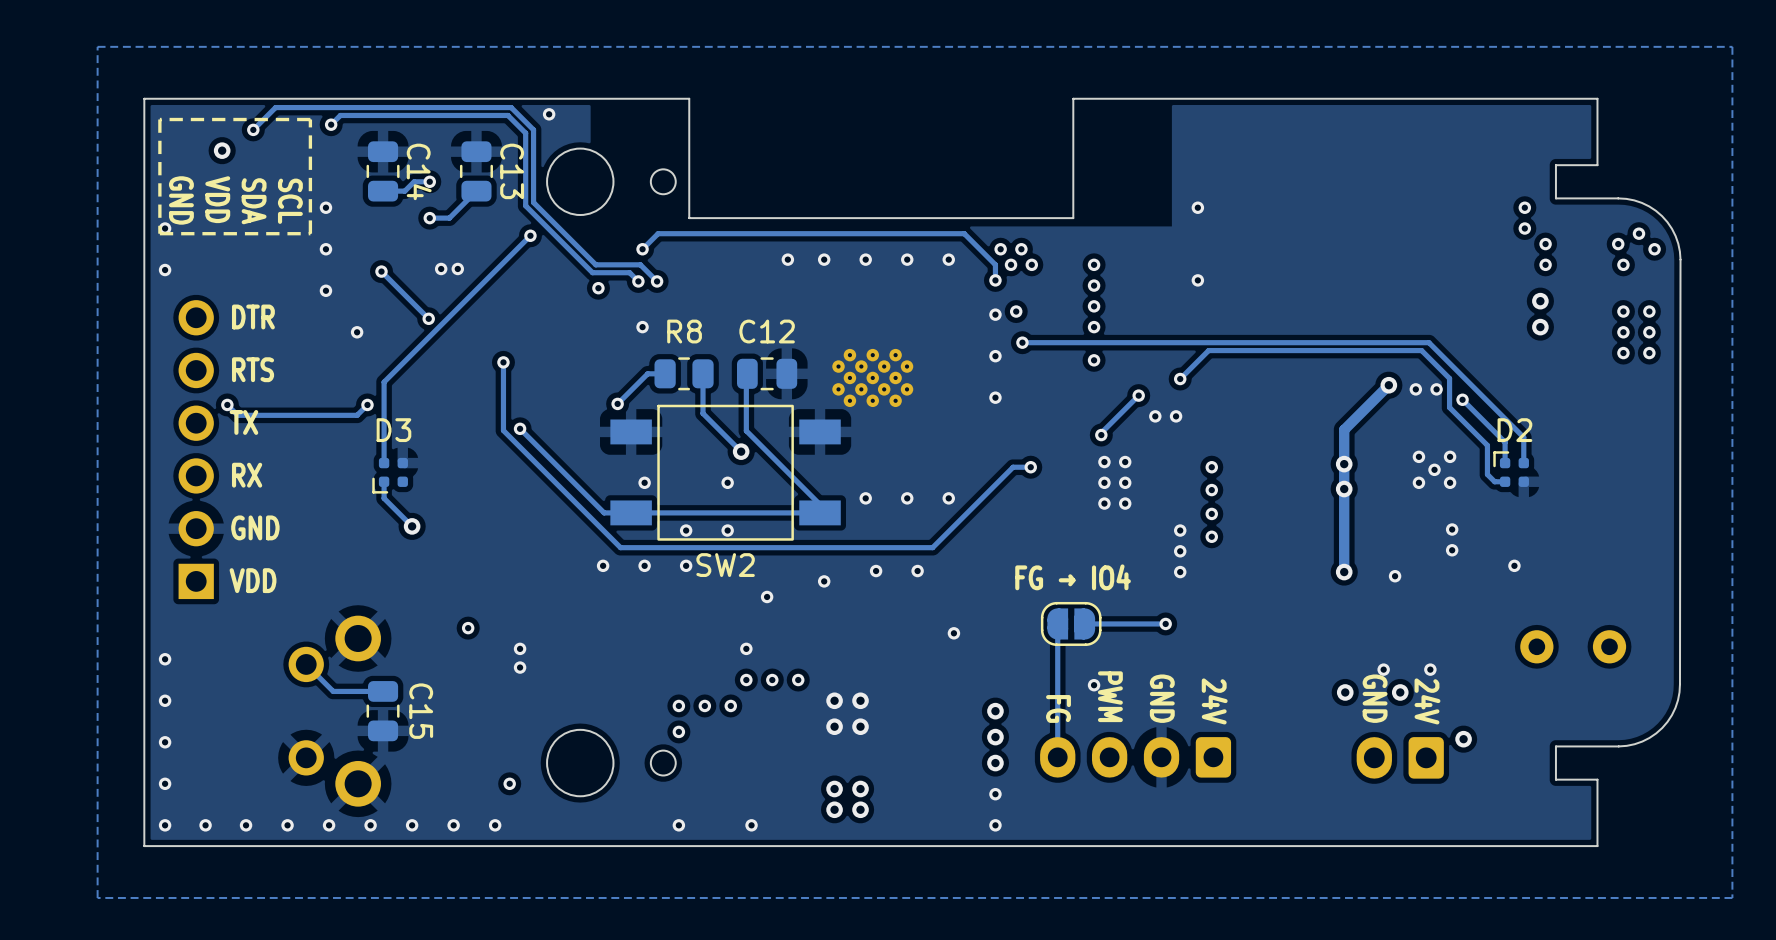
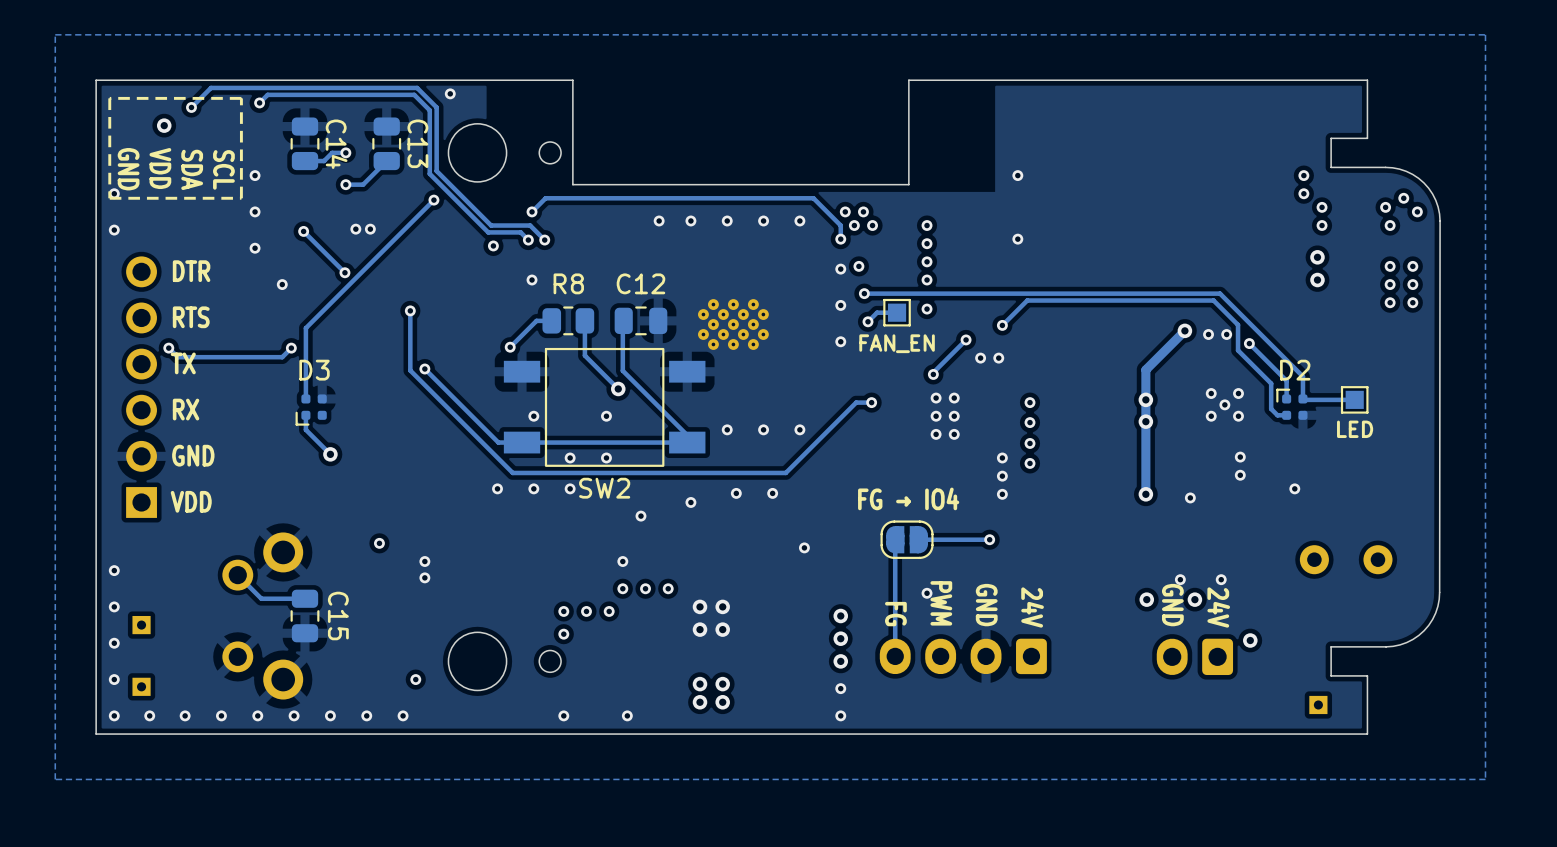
track: none -> (897, 312) (877, 312) (867, 321)
part: none -> FAN_EN (897, 312)
via: none -> (867, 321)
track: none -> (1356, 398) (1354, 399) (1302, 398)
part: none -> LED (1354, 399)
part: none -> (141, 625)
part: none -> (141, 686)
part: none -> (1318, 704)

